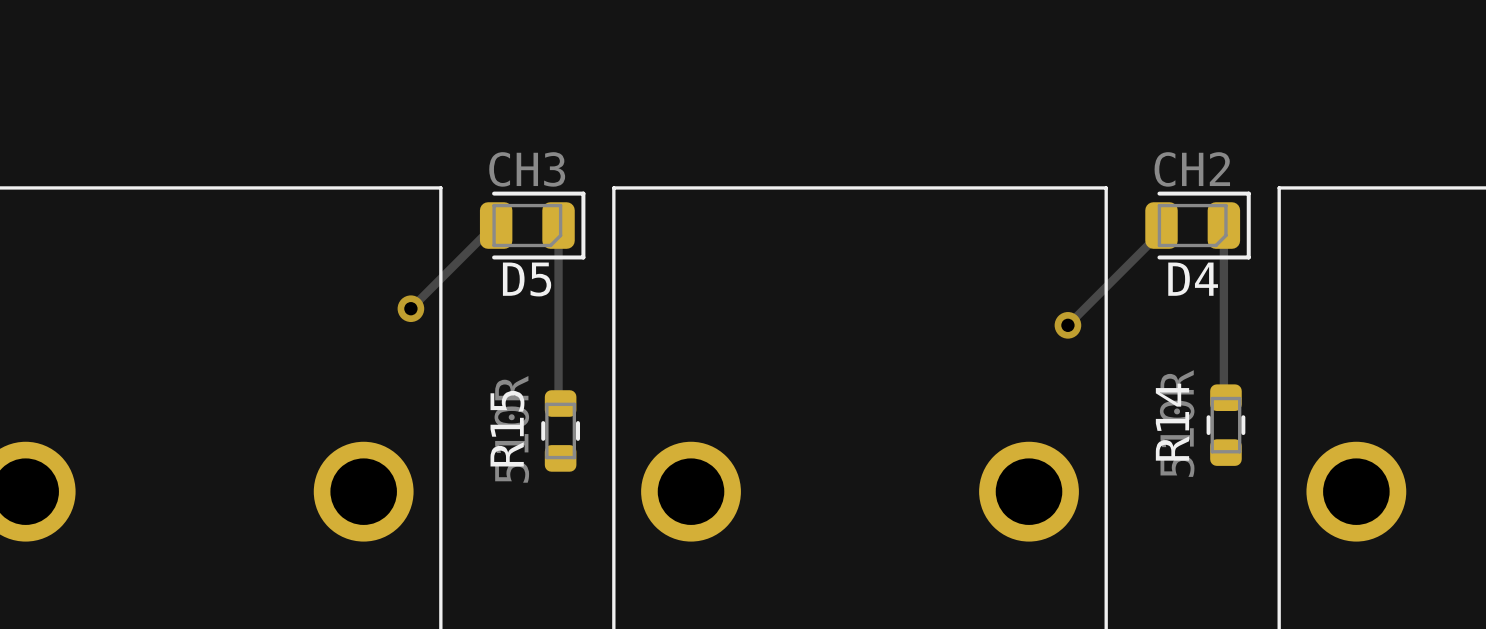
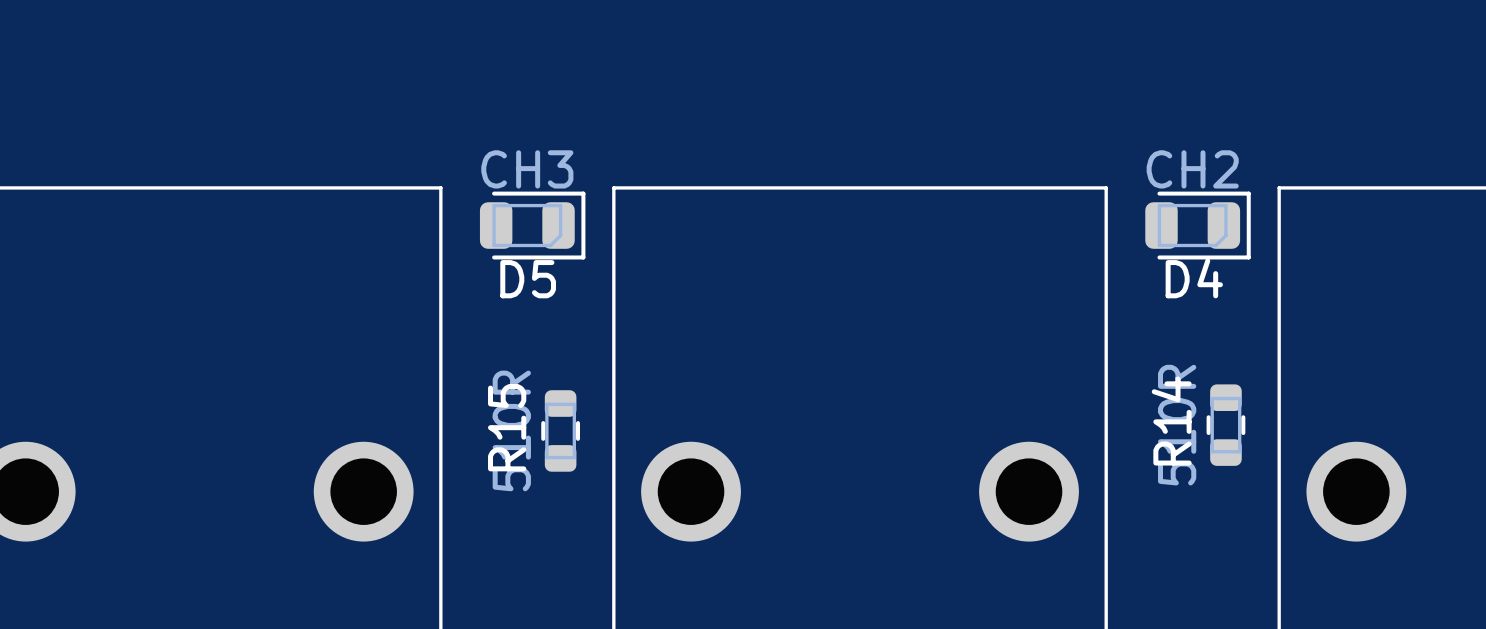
track: (496, 225) (410, 308) -> none
track: (558, 225) (558, 401) -> none
track: (1161, 225) (1161, 231) (1067, 325) -> none
track: (1223, 225) (1223, 395) -> none
via: (410, 308) -> none
via: (1067, 325) -> none

